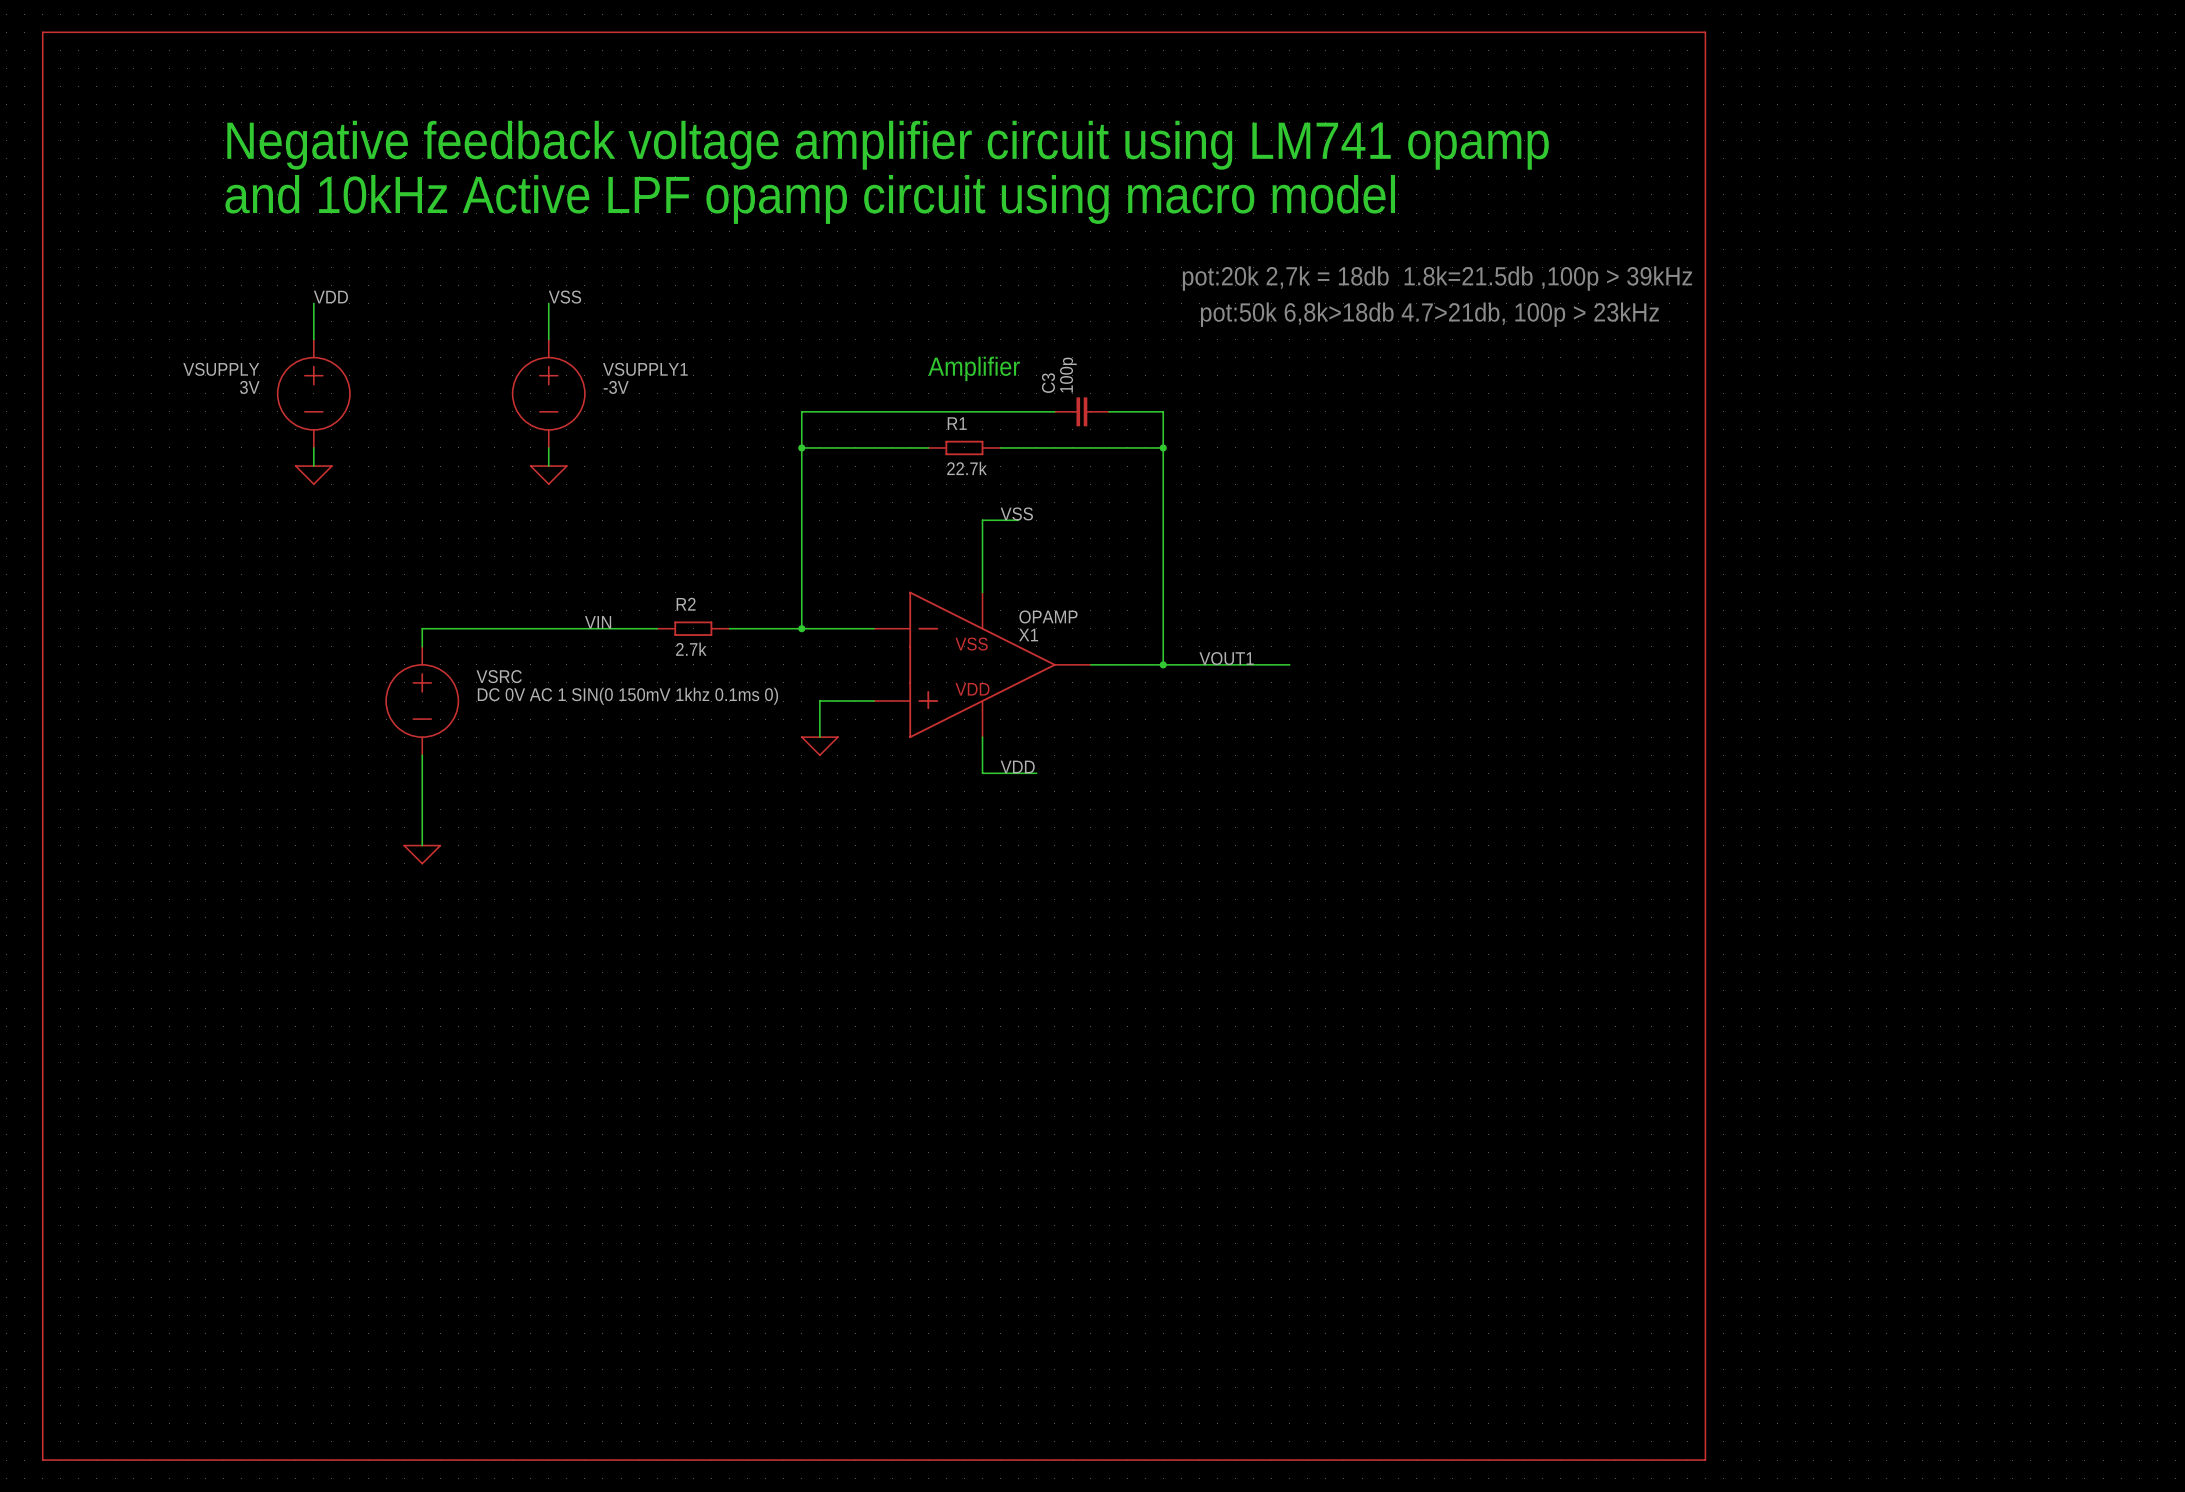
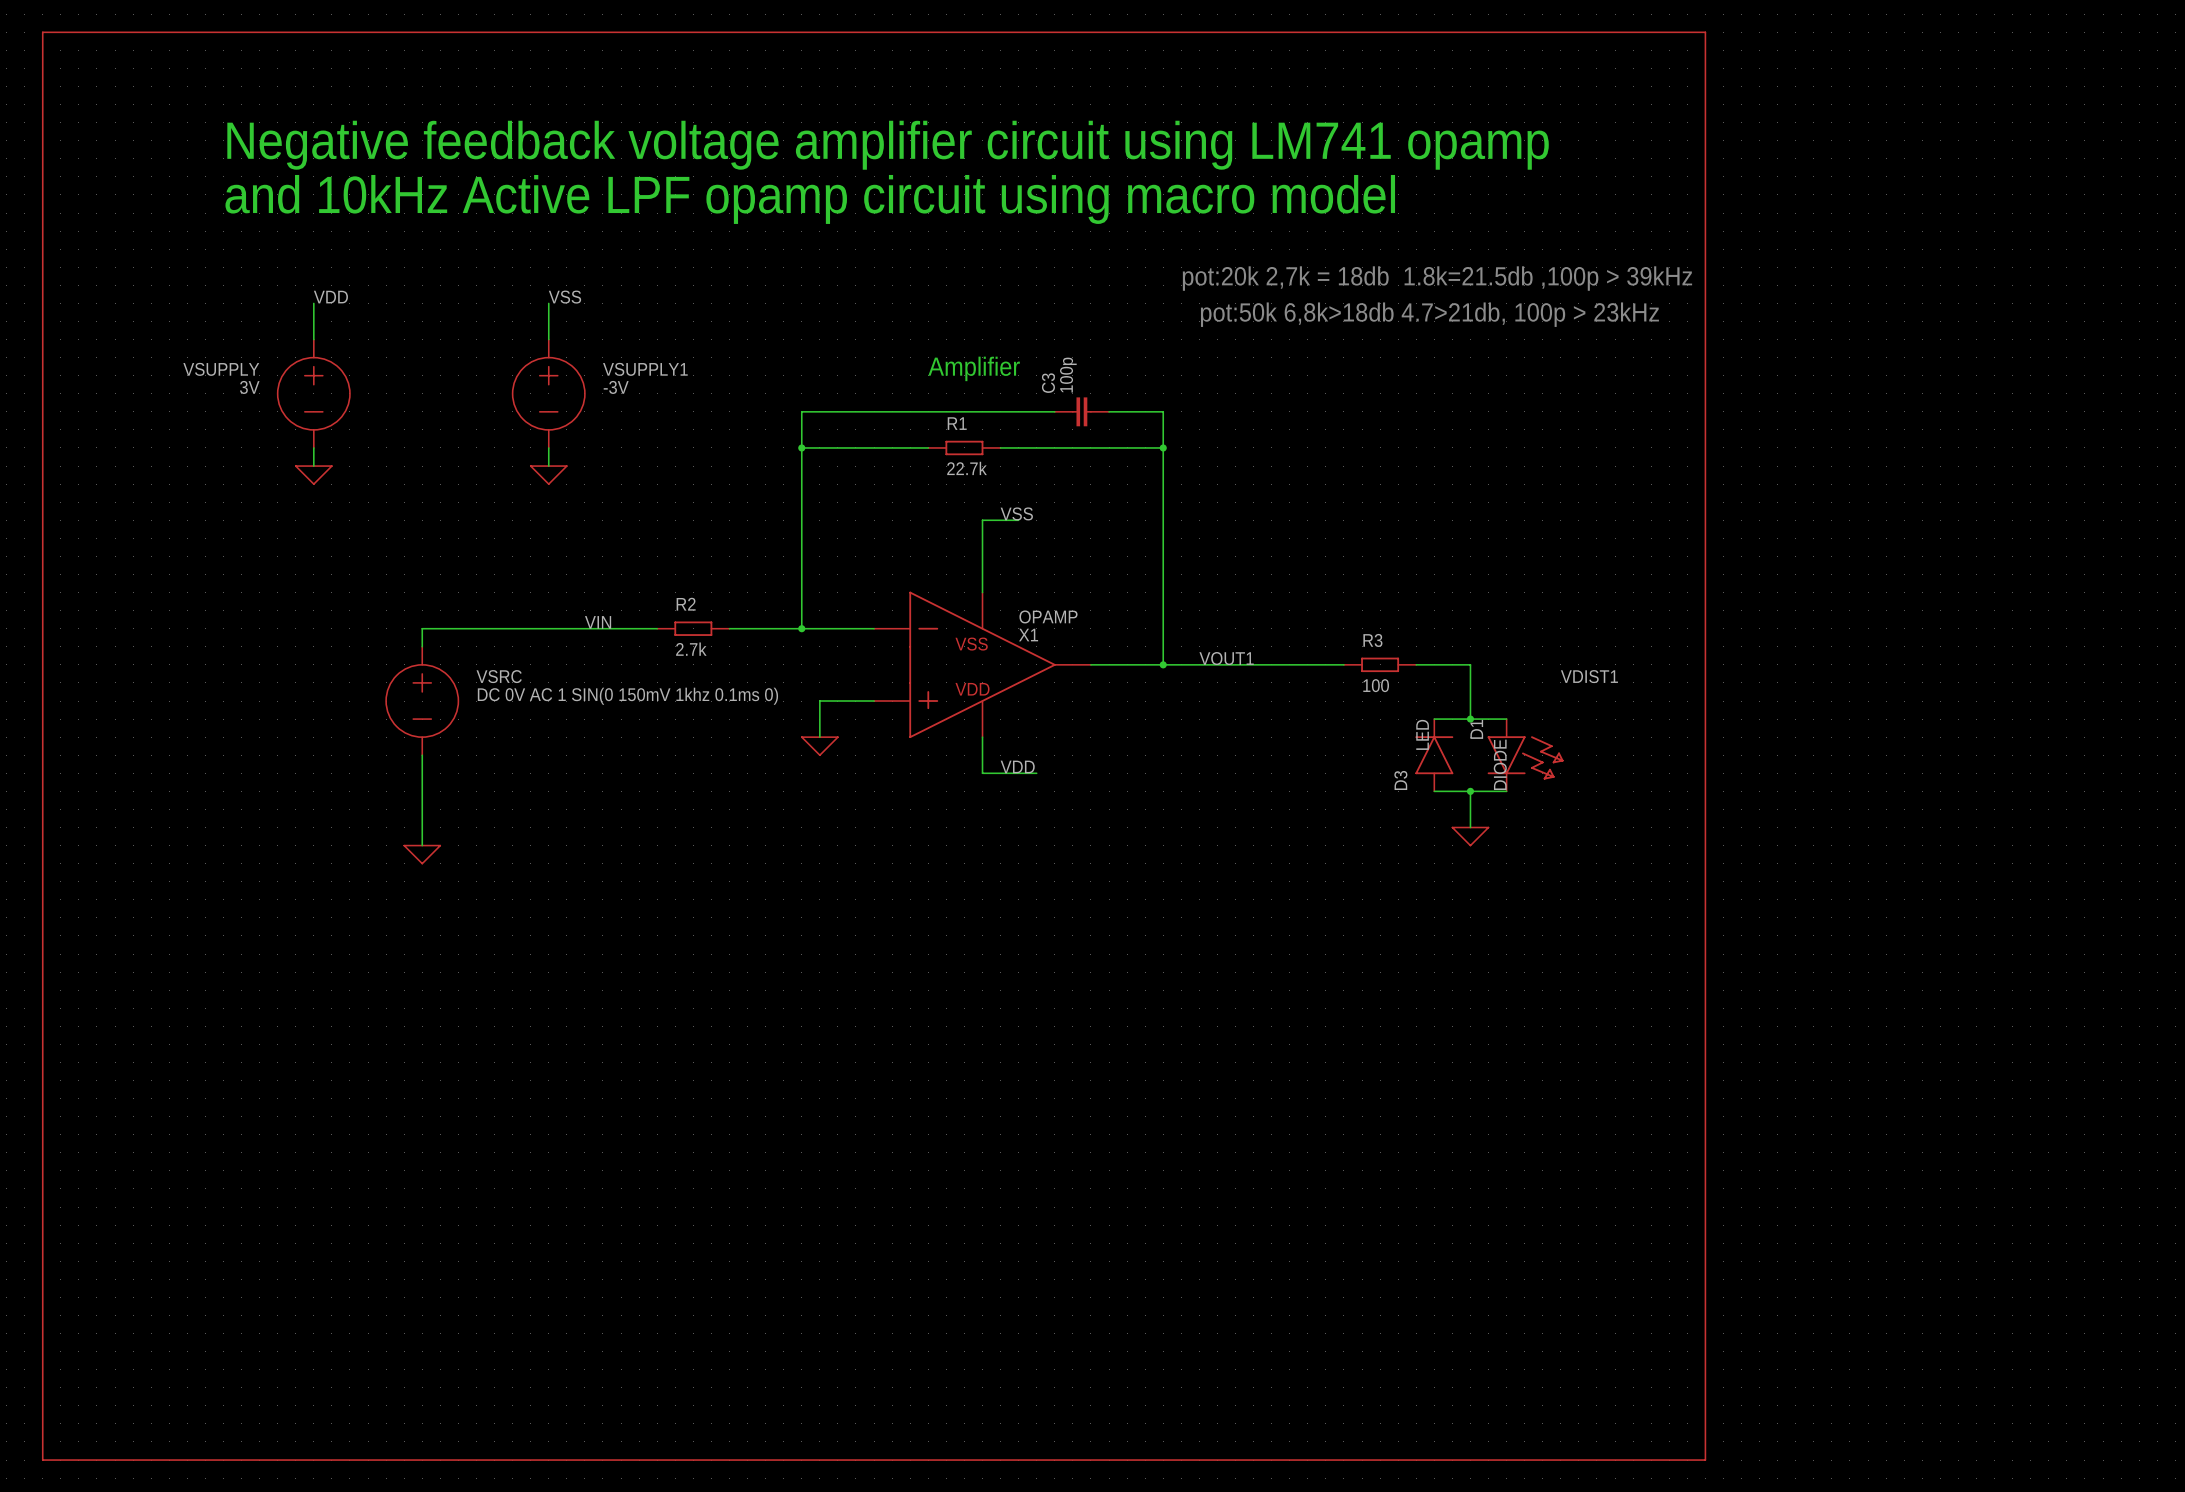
wire: none -> (1289, 664) (1343, 664)
R3: none -> 100 (1380, 664)
wire: none -> (1416, 664) (1470, 664) (1470, 719)
label: none -> VDIST1 (1589, 676)
wire: none -> (1434, 719) (1506, 719)
junction: none -> (1470, 719)
D3: none -> DIODE (1434, 755)
D1: none -> LED (1525, 755)
wire: none -> (1434, 791) (1506, 791)
wire: none -> (1470, 791) (1470, 827)
junction: none -> (1470, 791)
power symbol: none -> (1470, 836)

